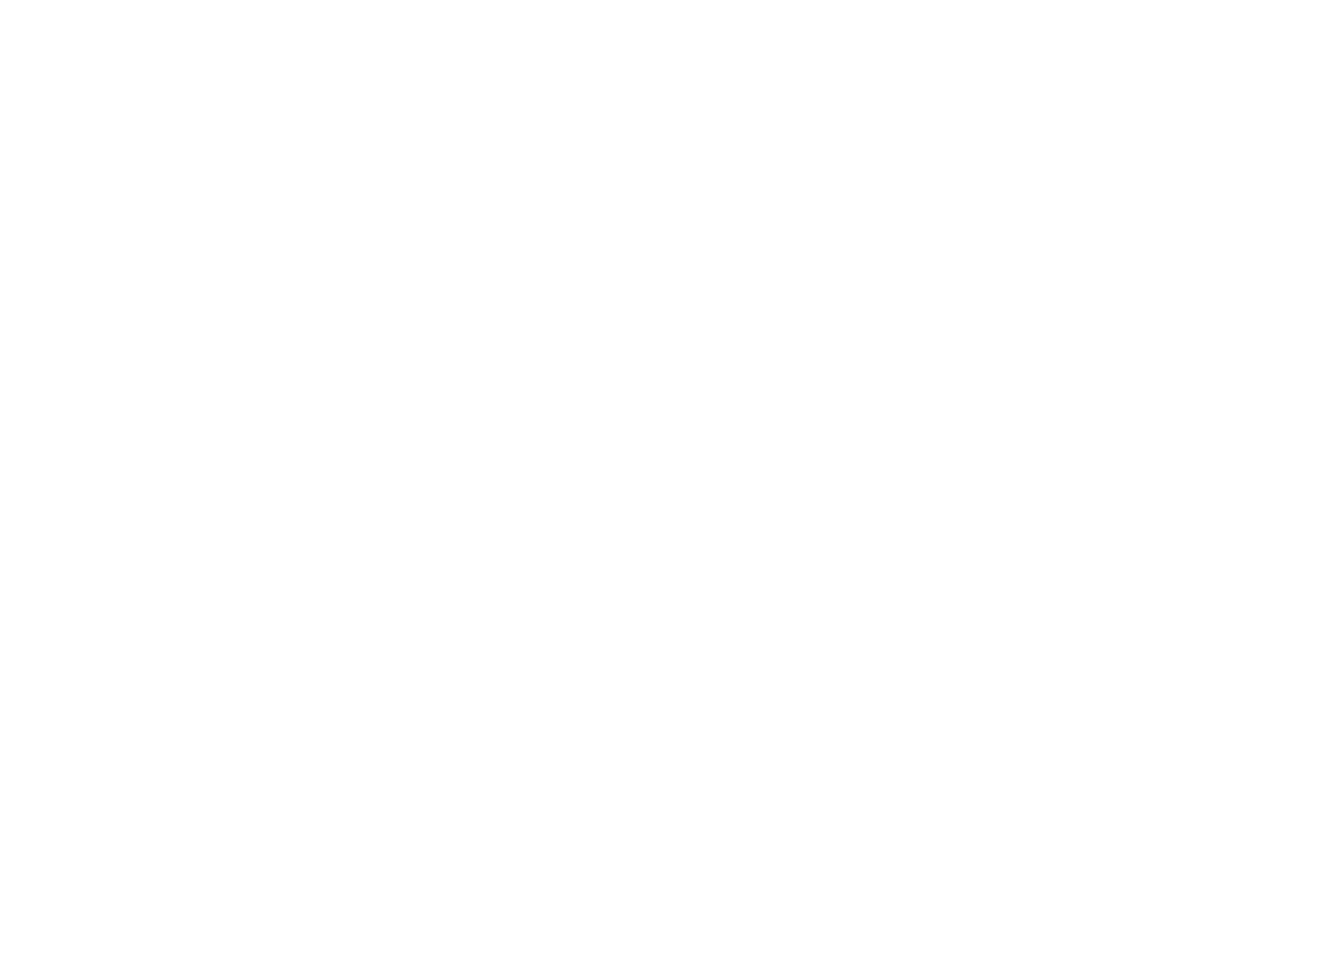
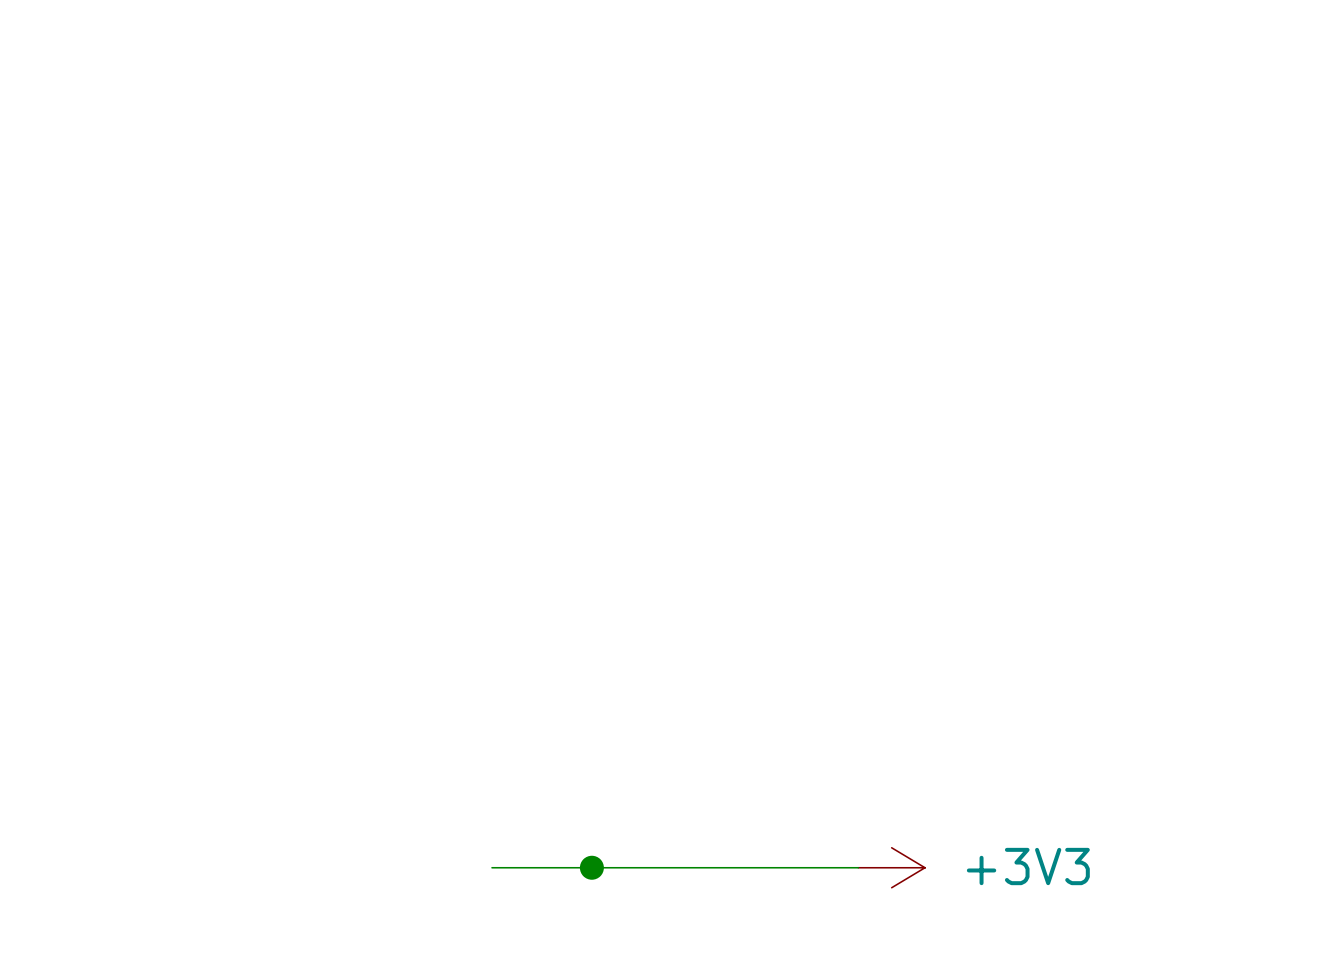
wire: none -> (491, 867) (858, 867)
junction: none -> (591, 867)
power symbol: none -> +3V3 (891, 867)

